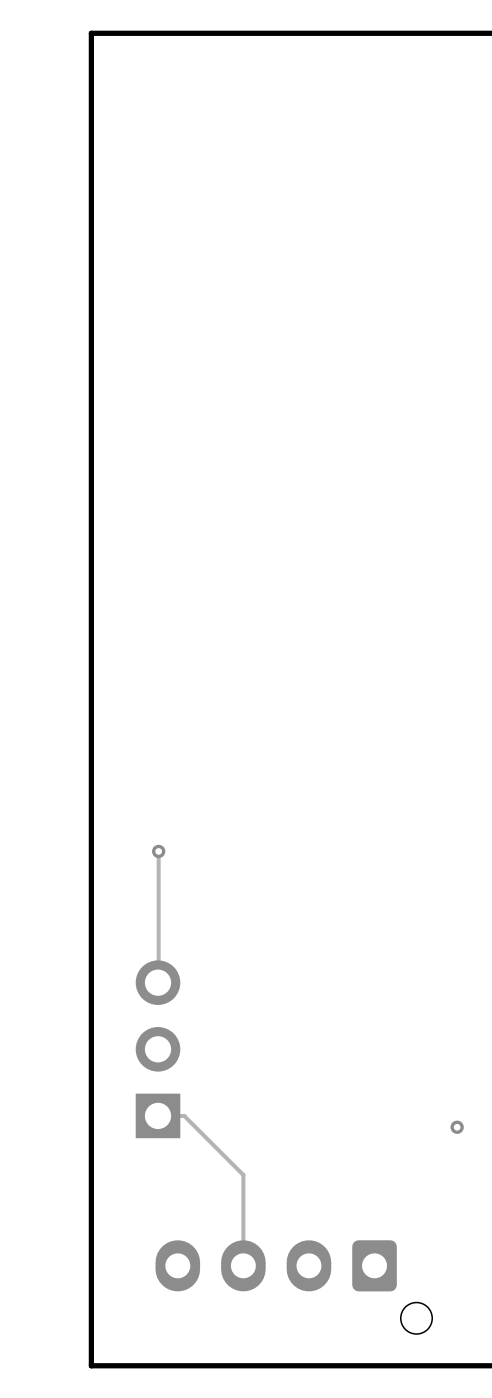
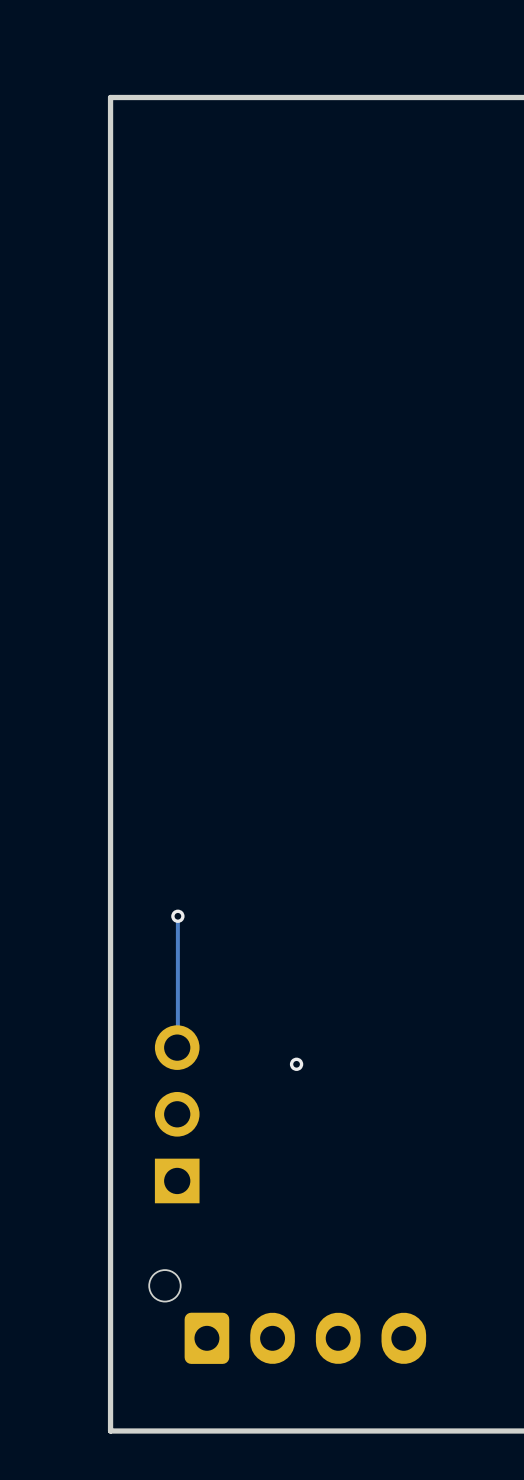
via: none -> (296, 1064)
track: (158, 1115) (184, 1115) (243, 1175) (243, 1265) -> none
via: (457, 1127) -> none
part rotation: 0° (293, 1287) -> 180° (287, 1316)

